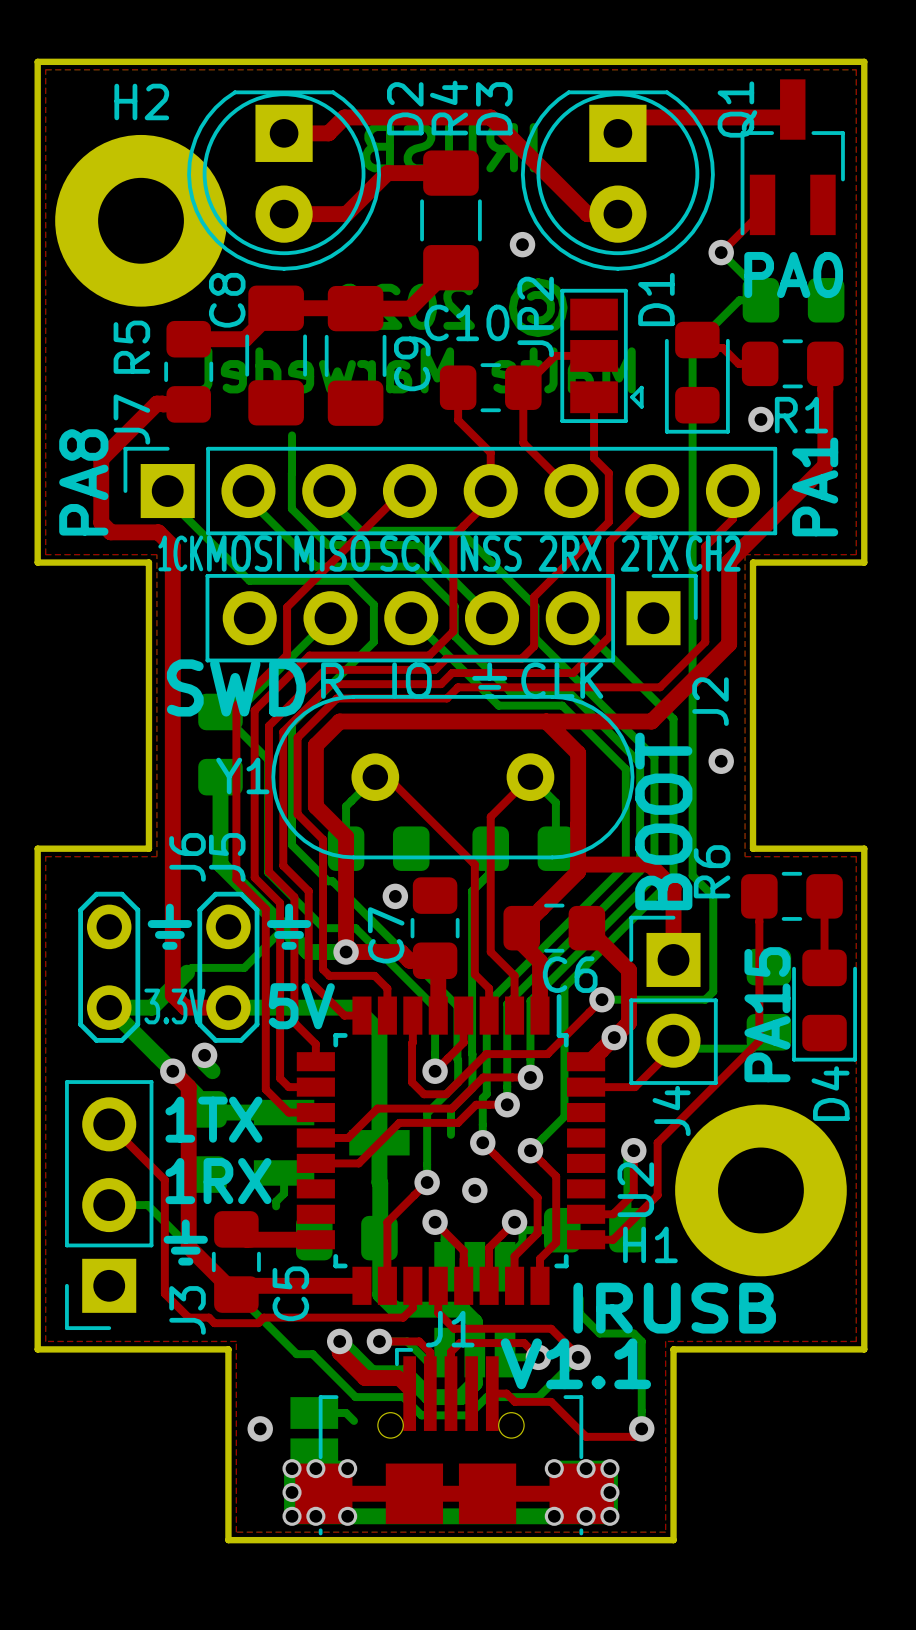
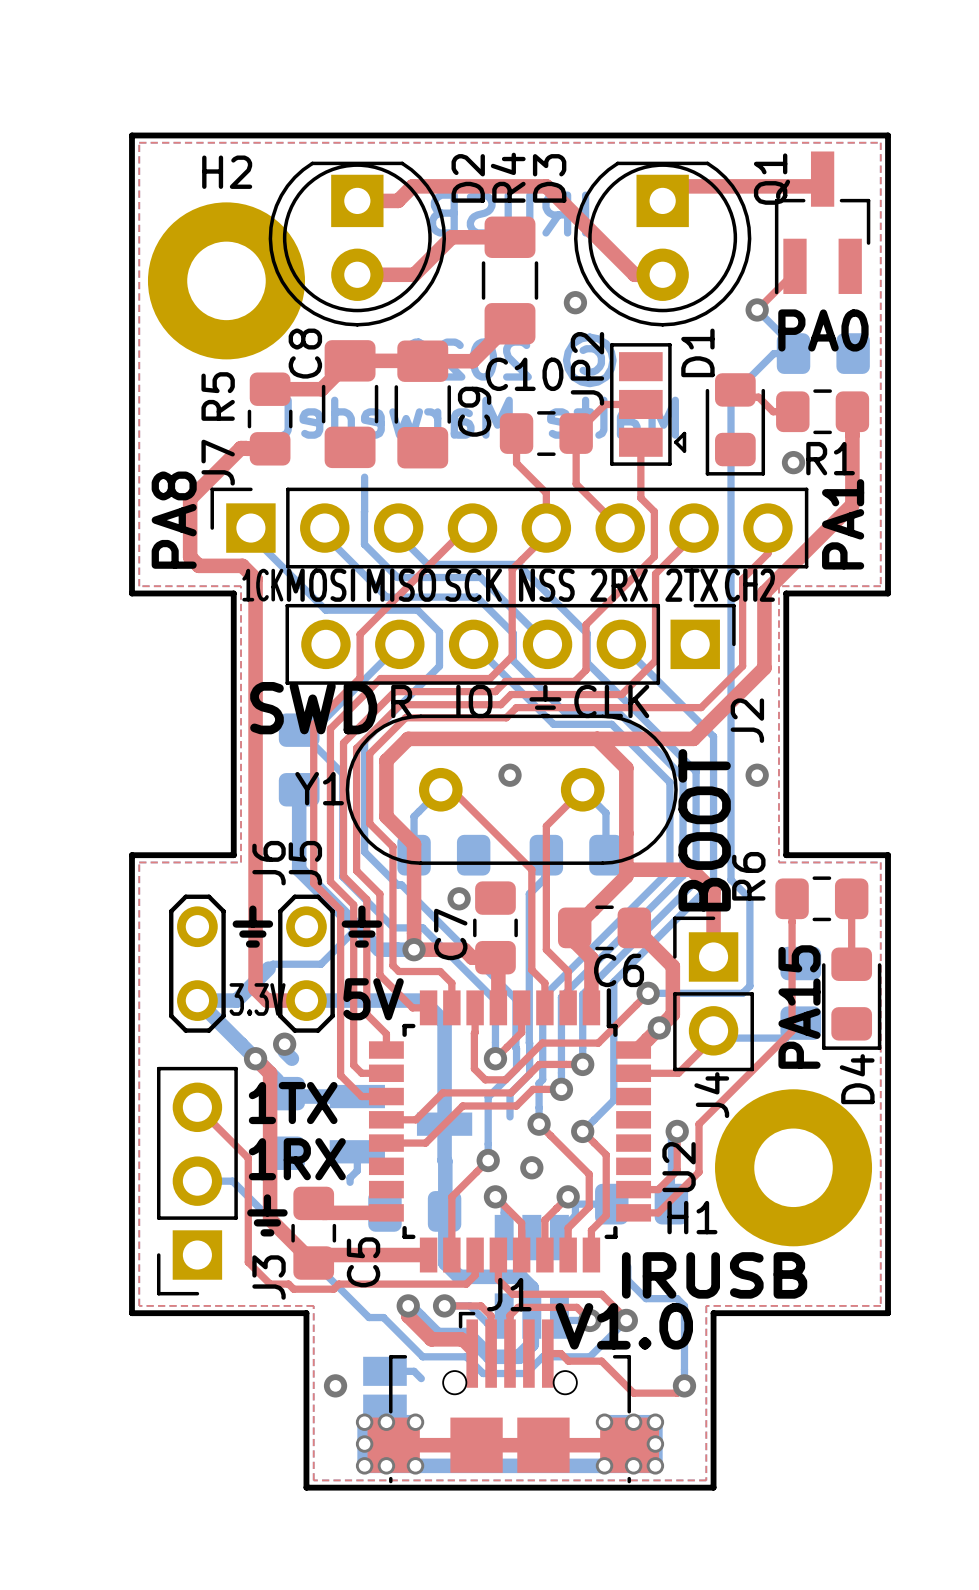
via: none -> (510, 775)
text: V1.1 (575, 1363) -> V1.0 (624, 1326)

